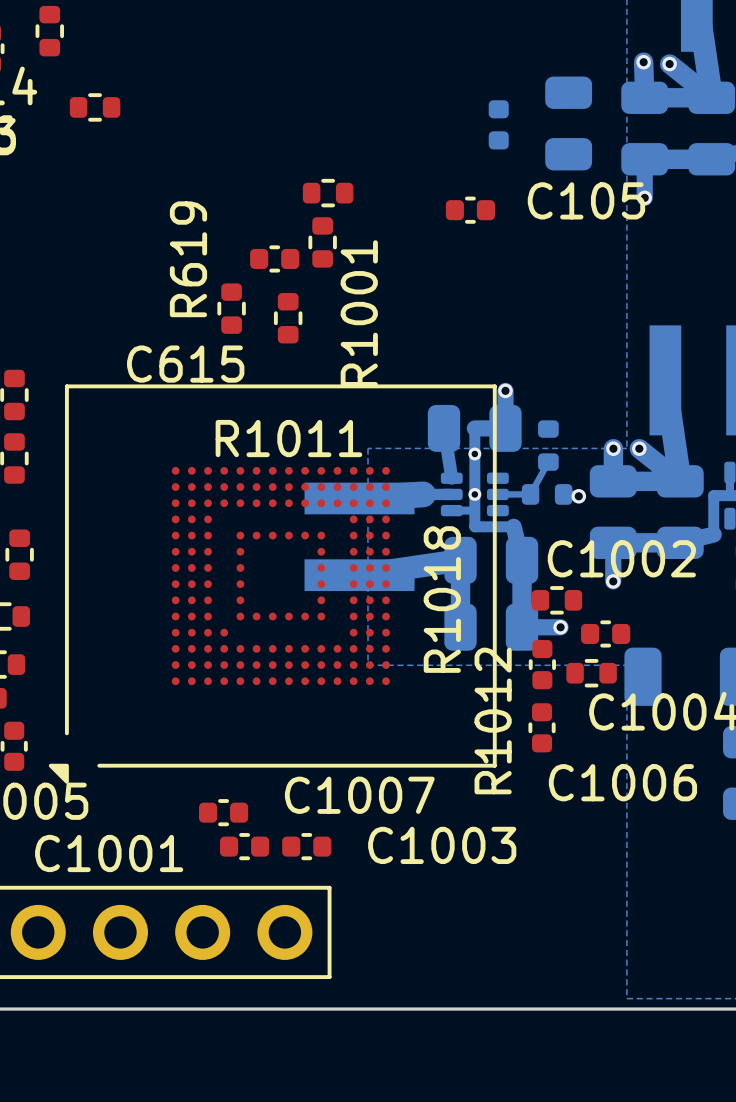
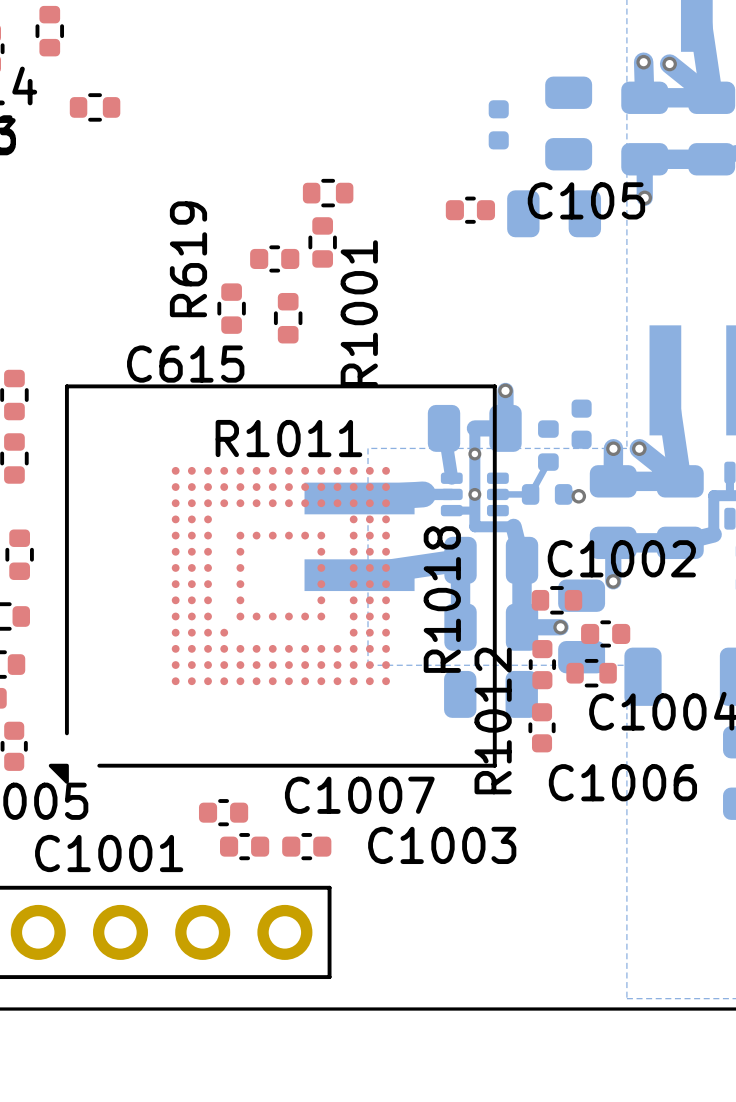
part: none -> (554, 213)
part: none -> (581, 424)
part: none -> (581, 626)
part: none -> (490, 694)

